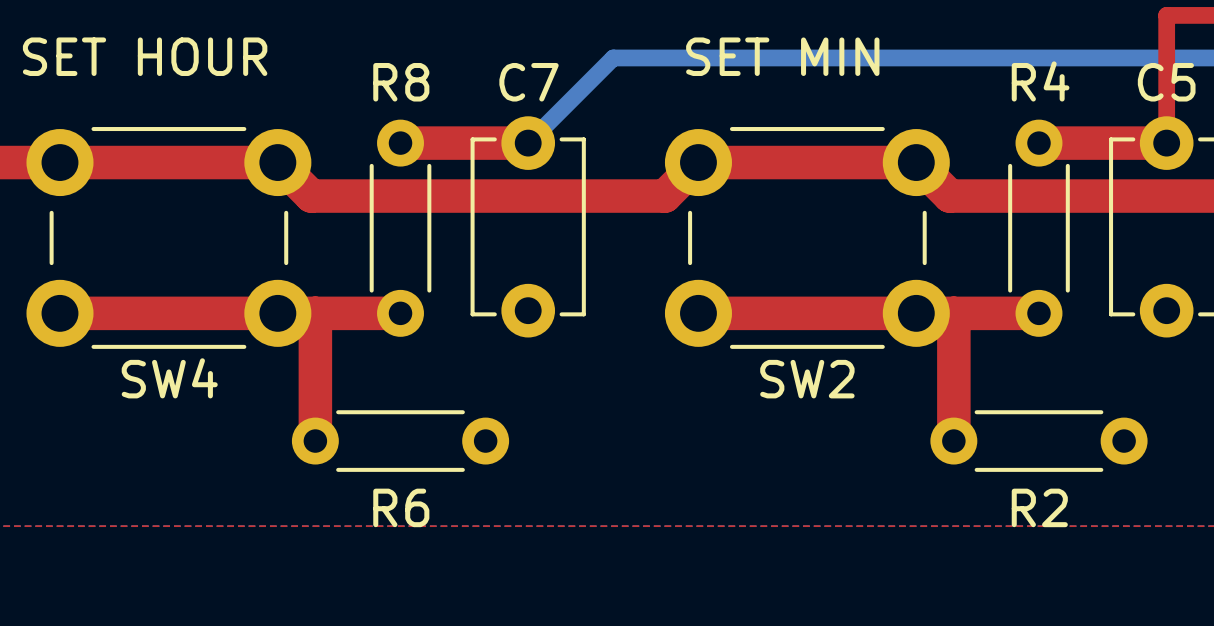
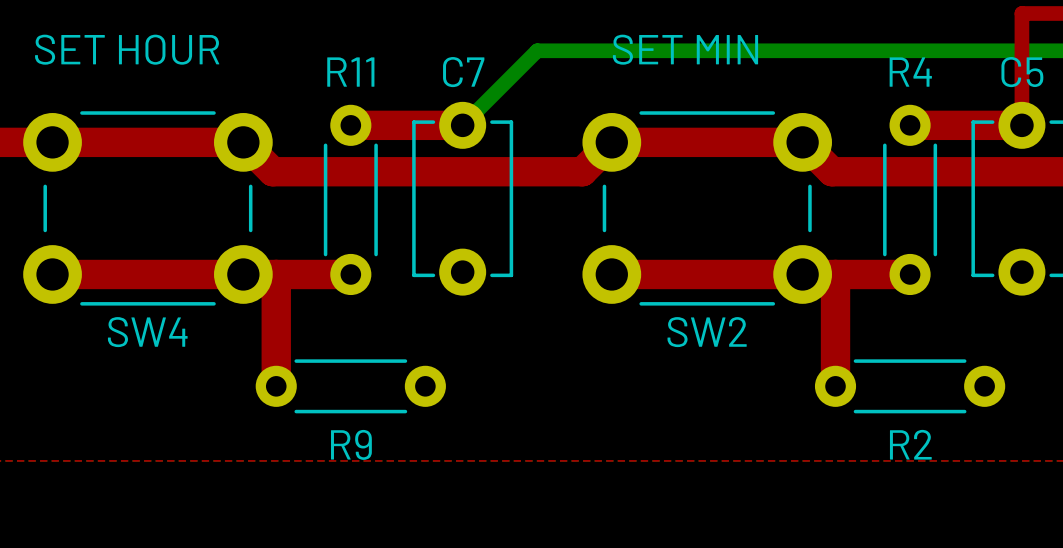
R8 name: R8 (401, 82) -> R11 (350, 72)
R6 name: R6 (401, 507) -> R9 (351, 444)

